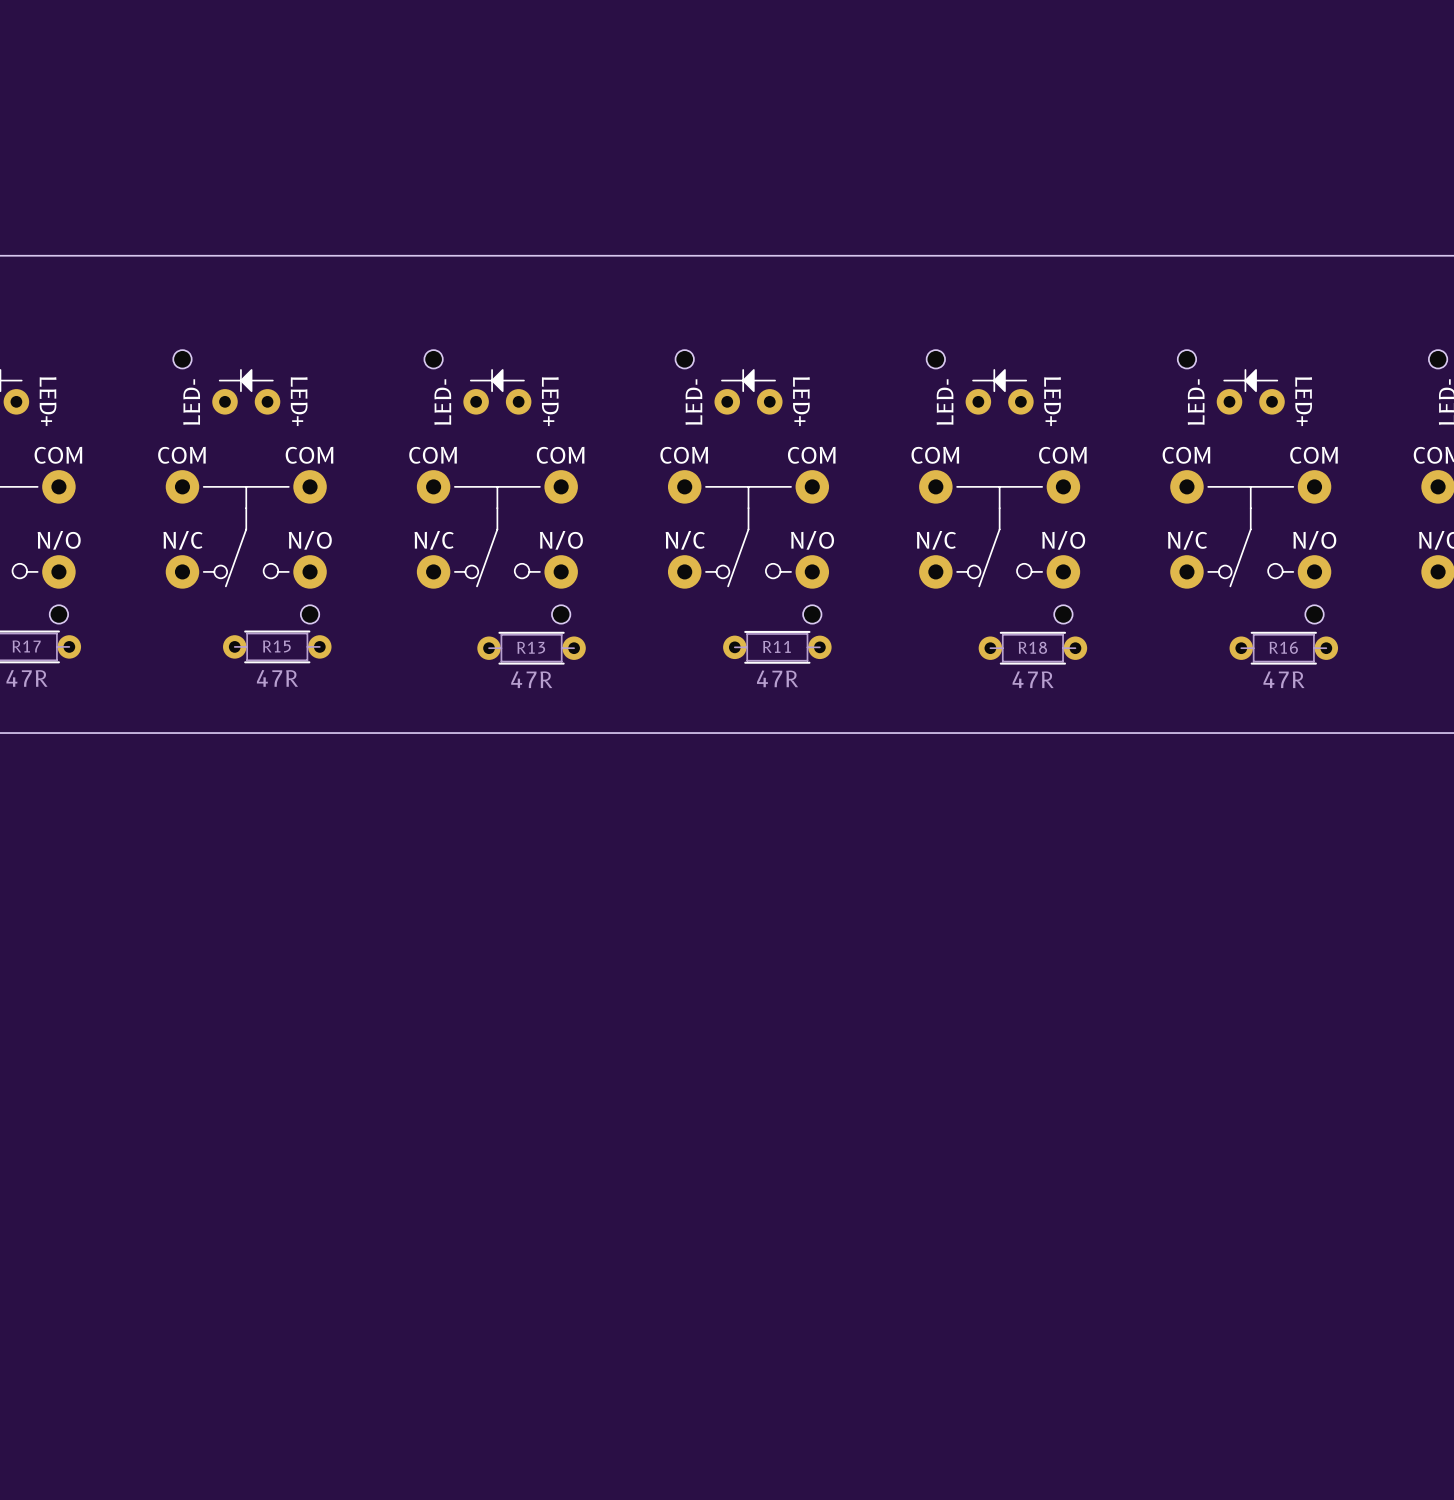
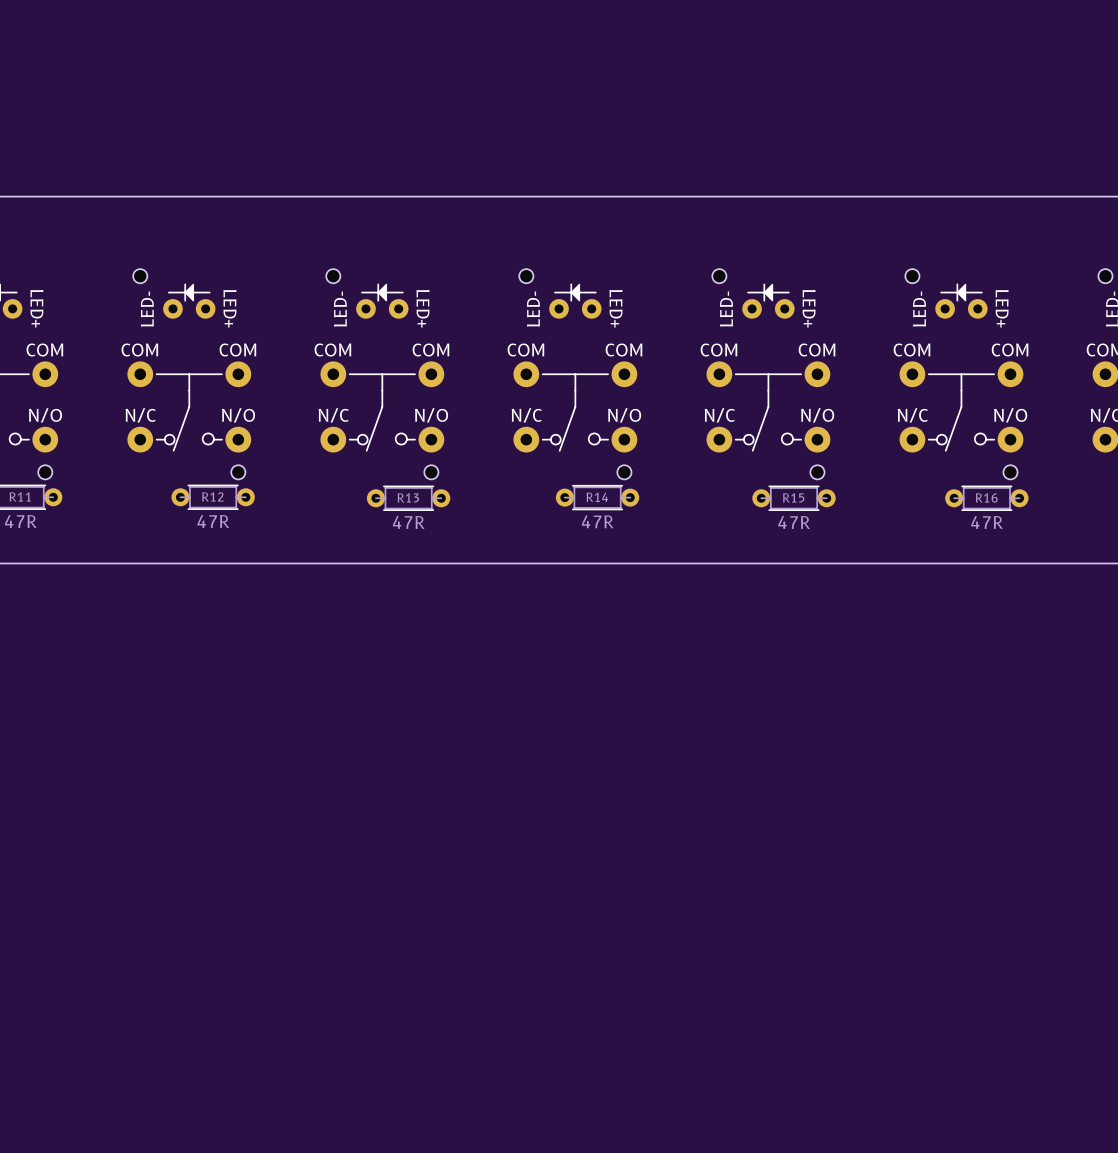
R17 name: R17 (26, 646) -> R11 (20, 496)
R15 name: R15 (276, 646) -> R12 (212, 496)
R11 name: R11 (776, 646) -> R14 (597, 497)
R18 name: R18 (1032, 647) -> R15 (793, 497)

